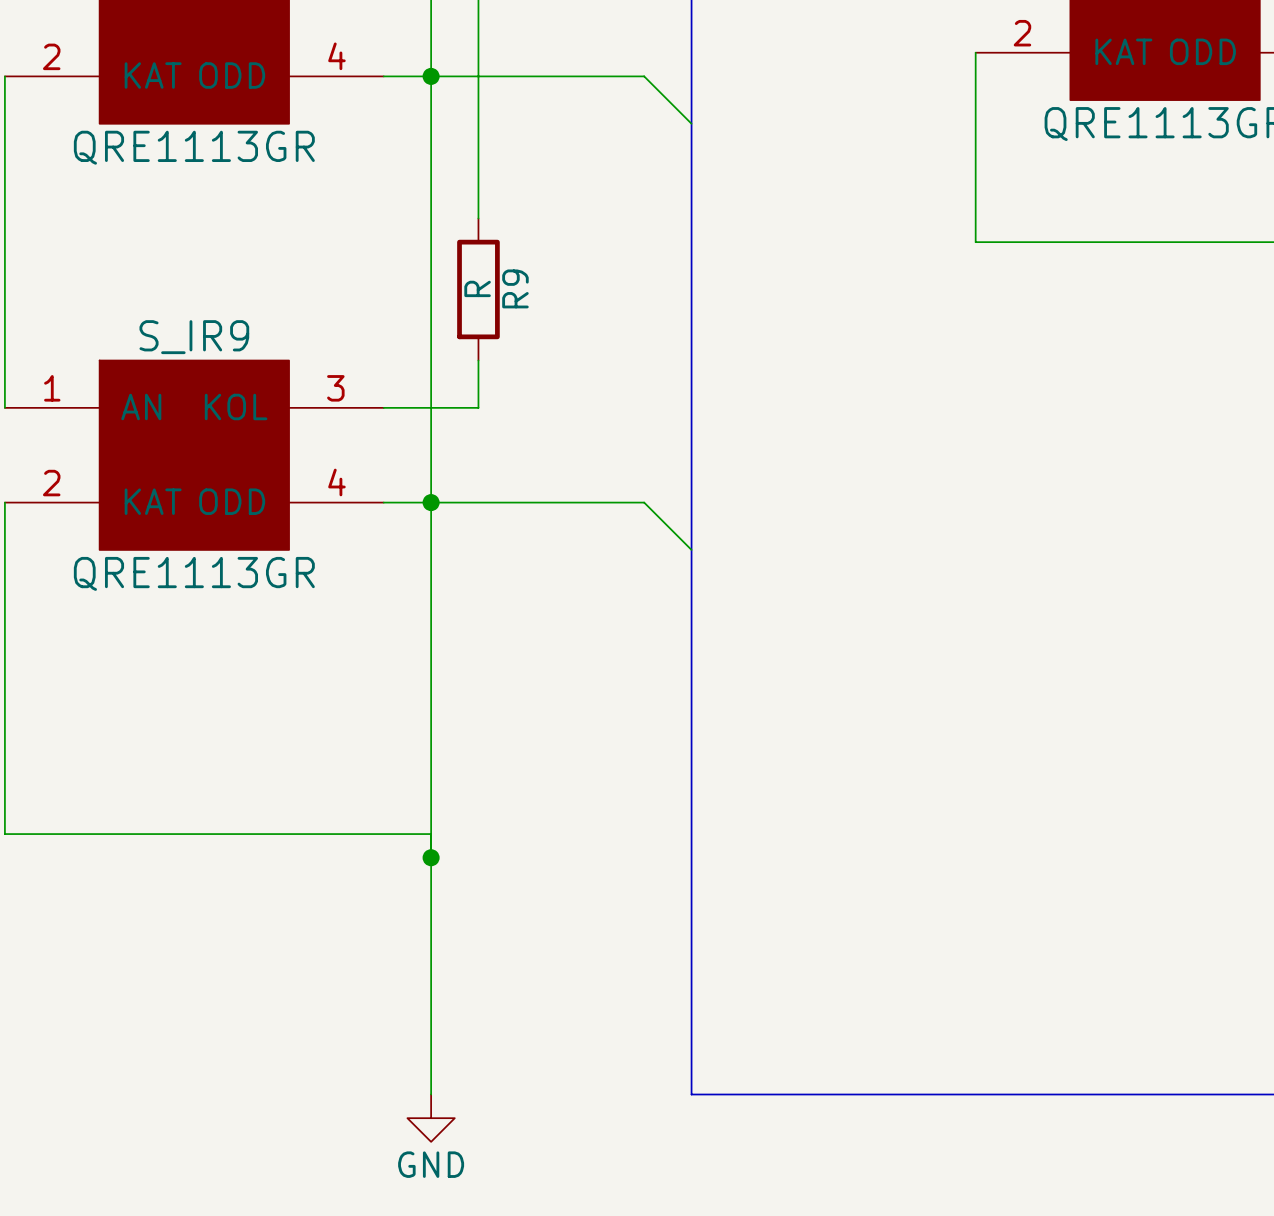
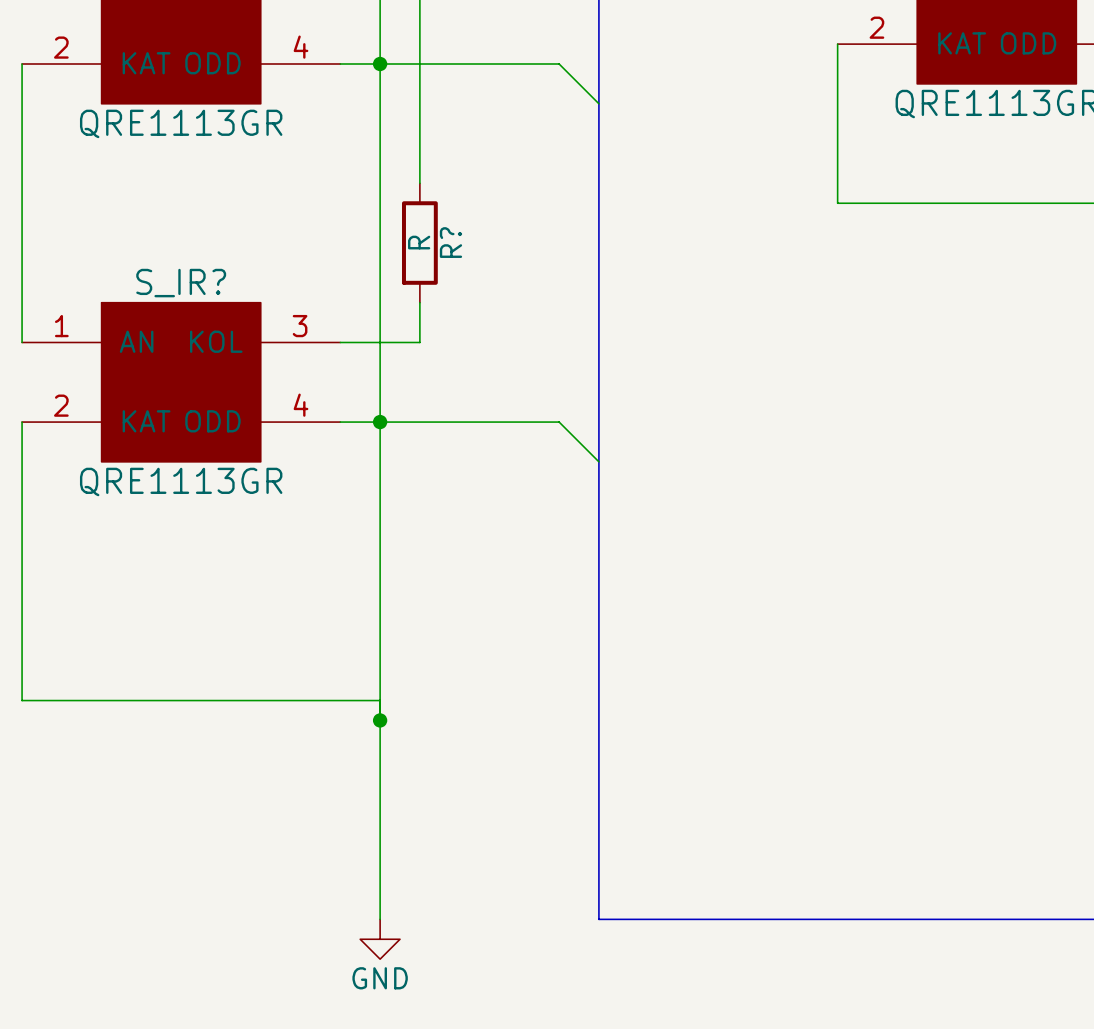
R9 name: R9 (515, 288) -> R? (450, 242)
S_IR9 name: S_IR9 (194, 337) -> S_IR? (181, 283)

